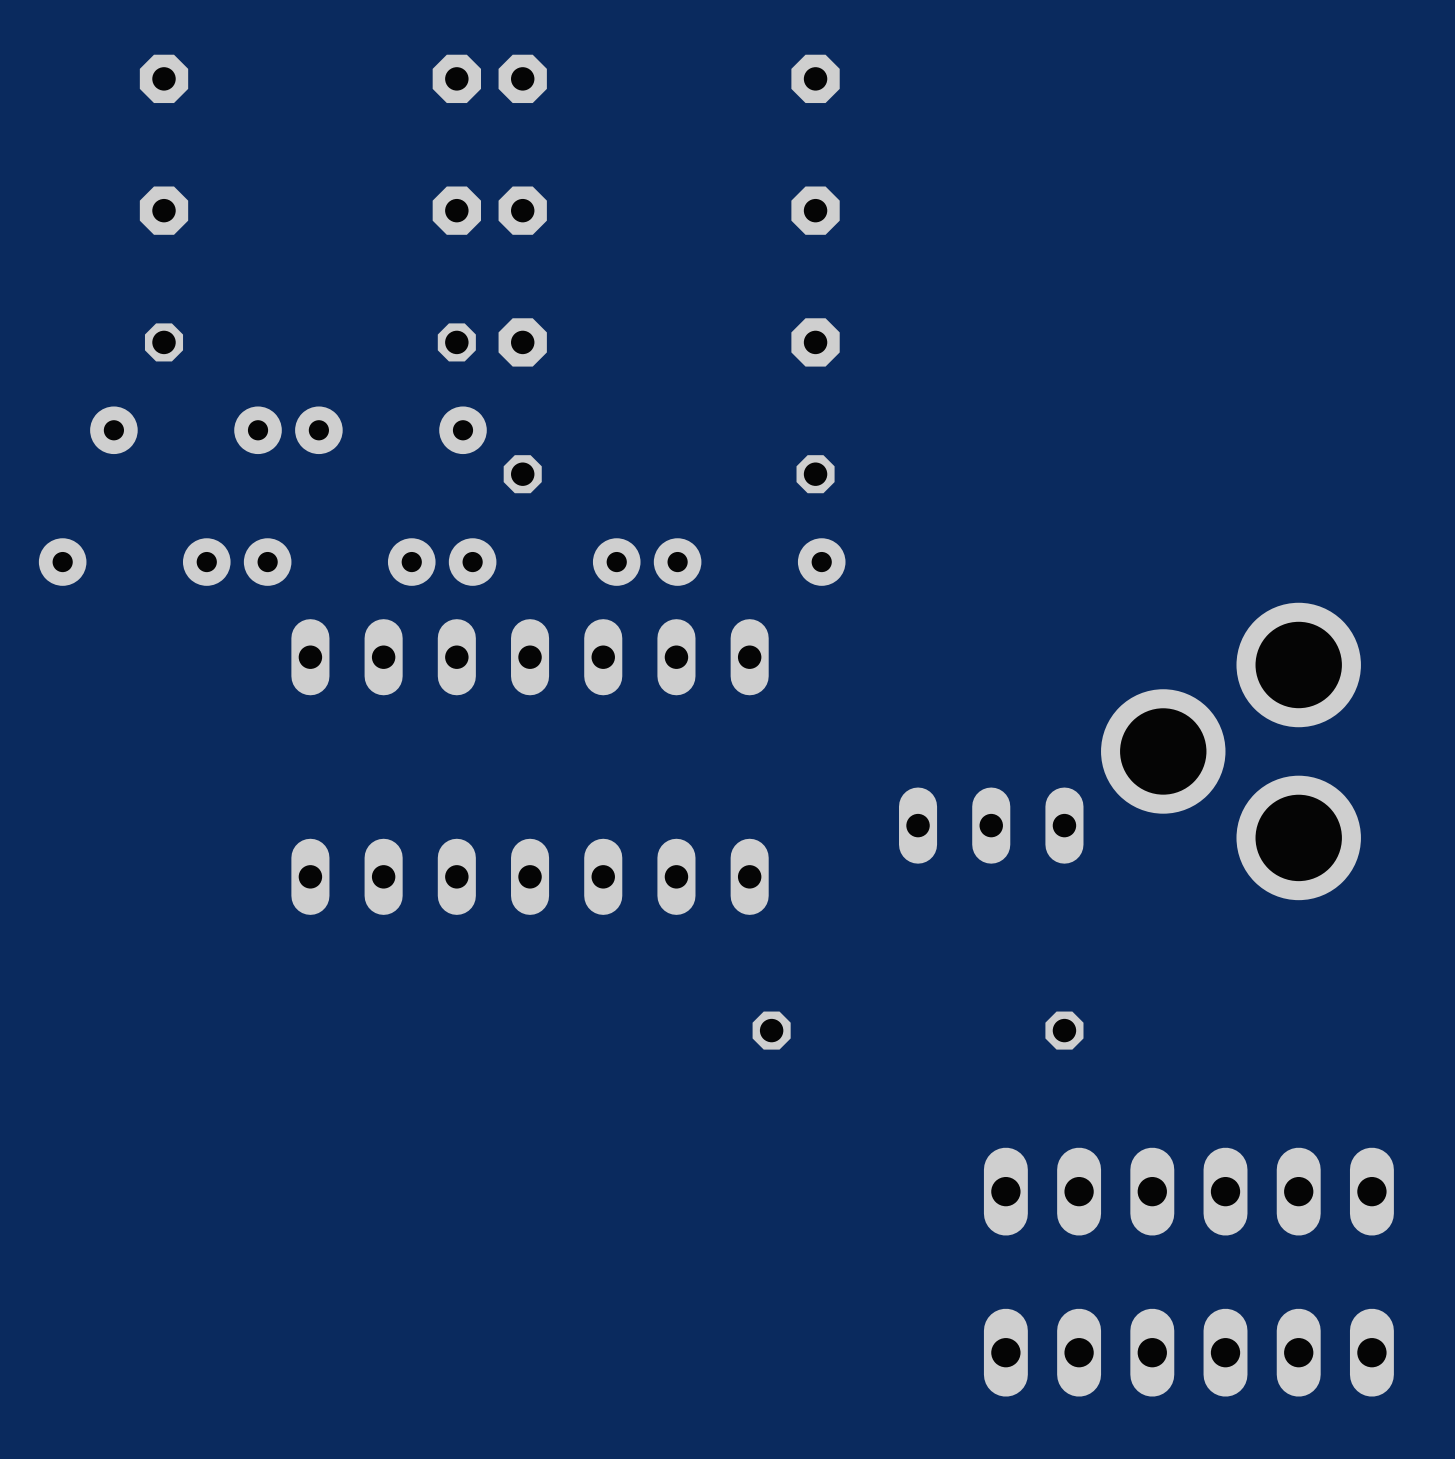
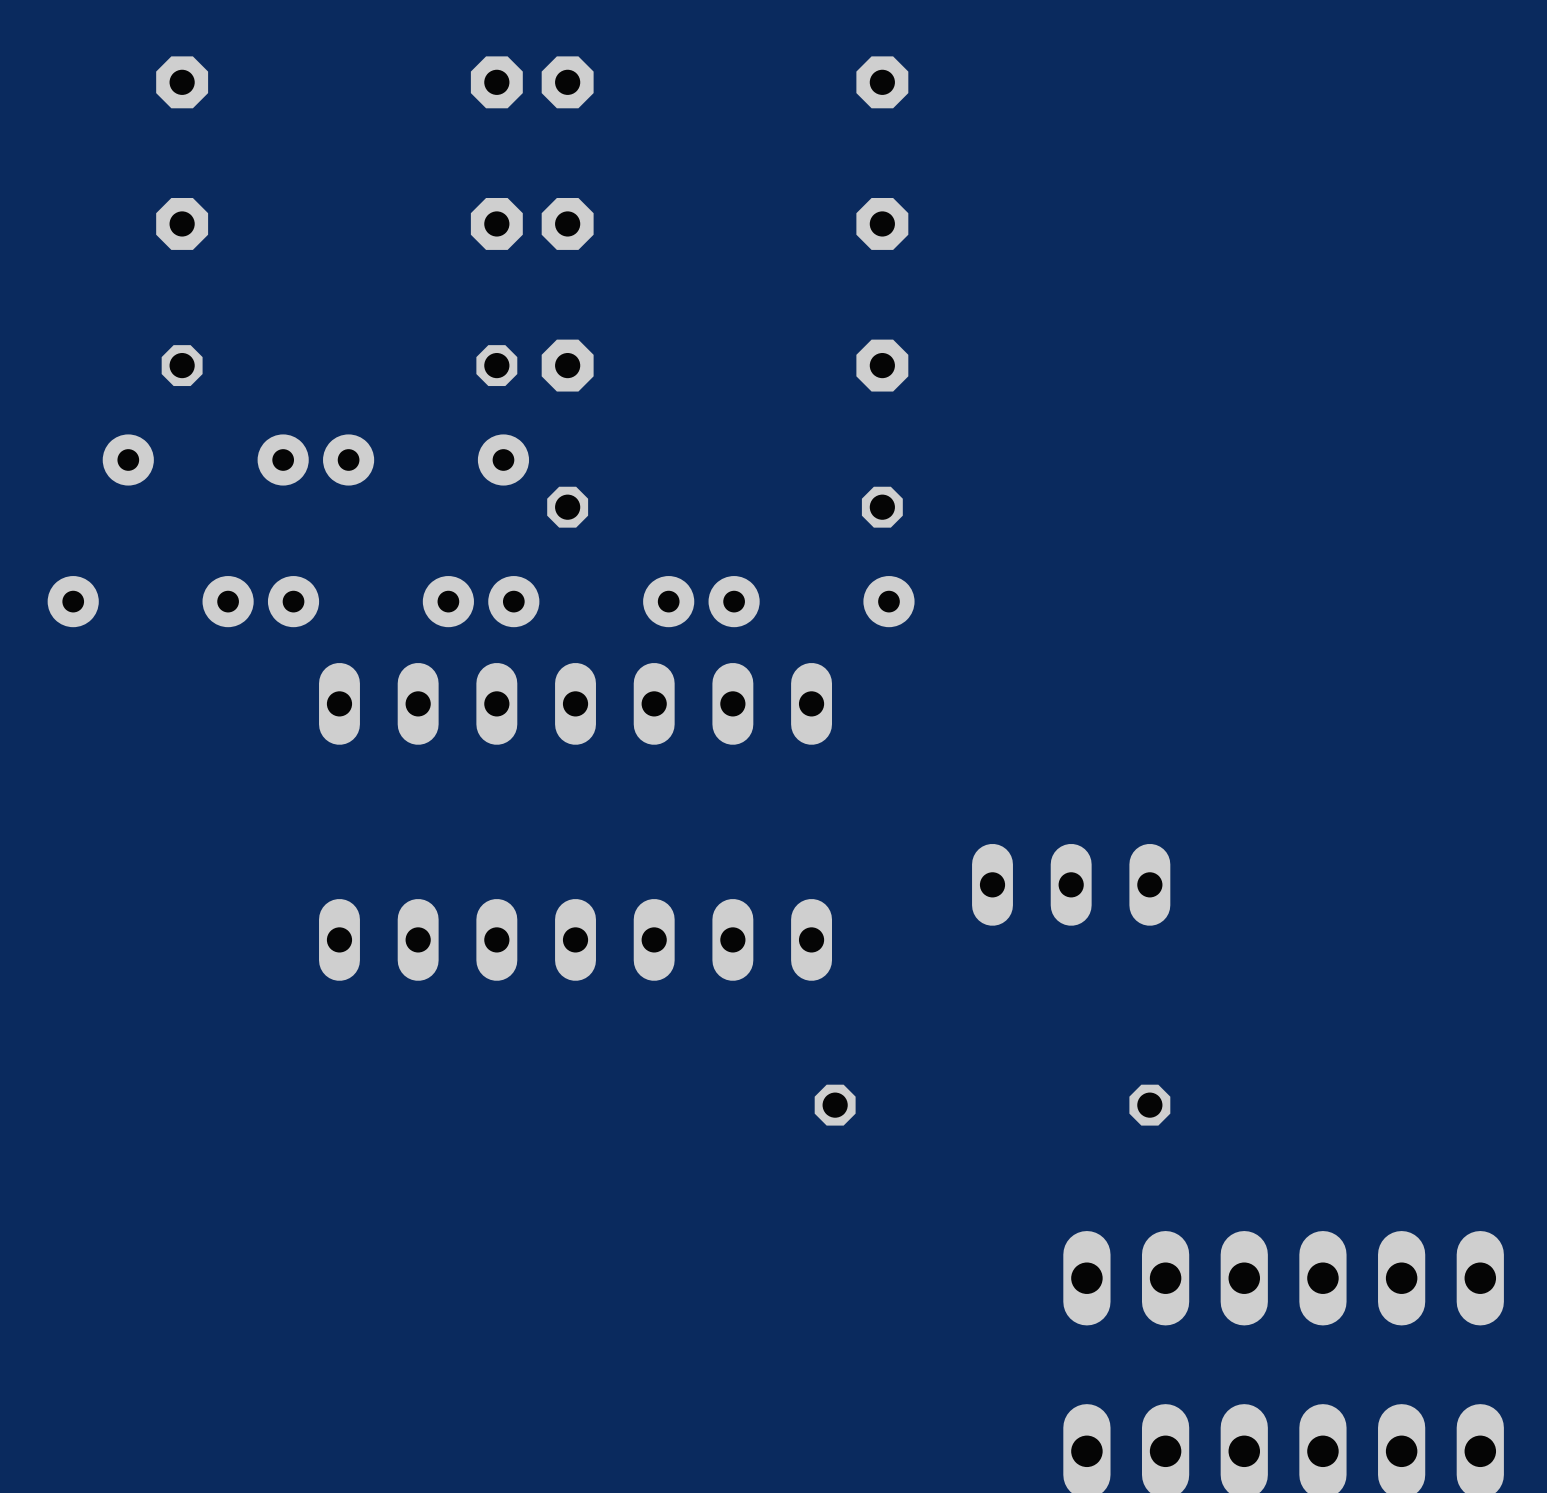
part: (1230, 751) -> none

